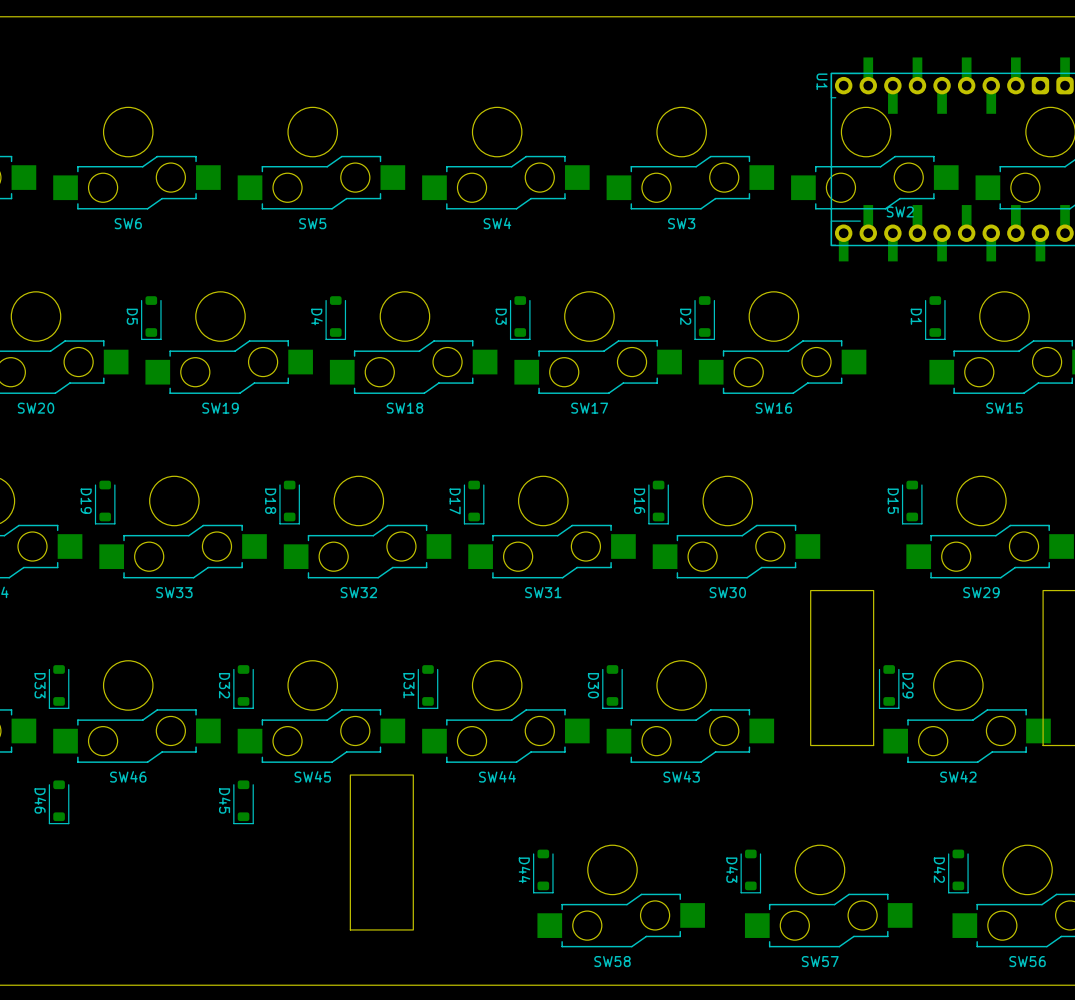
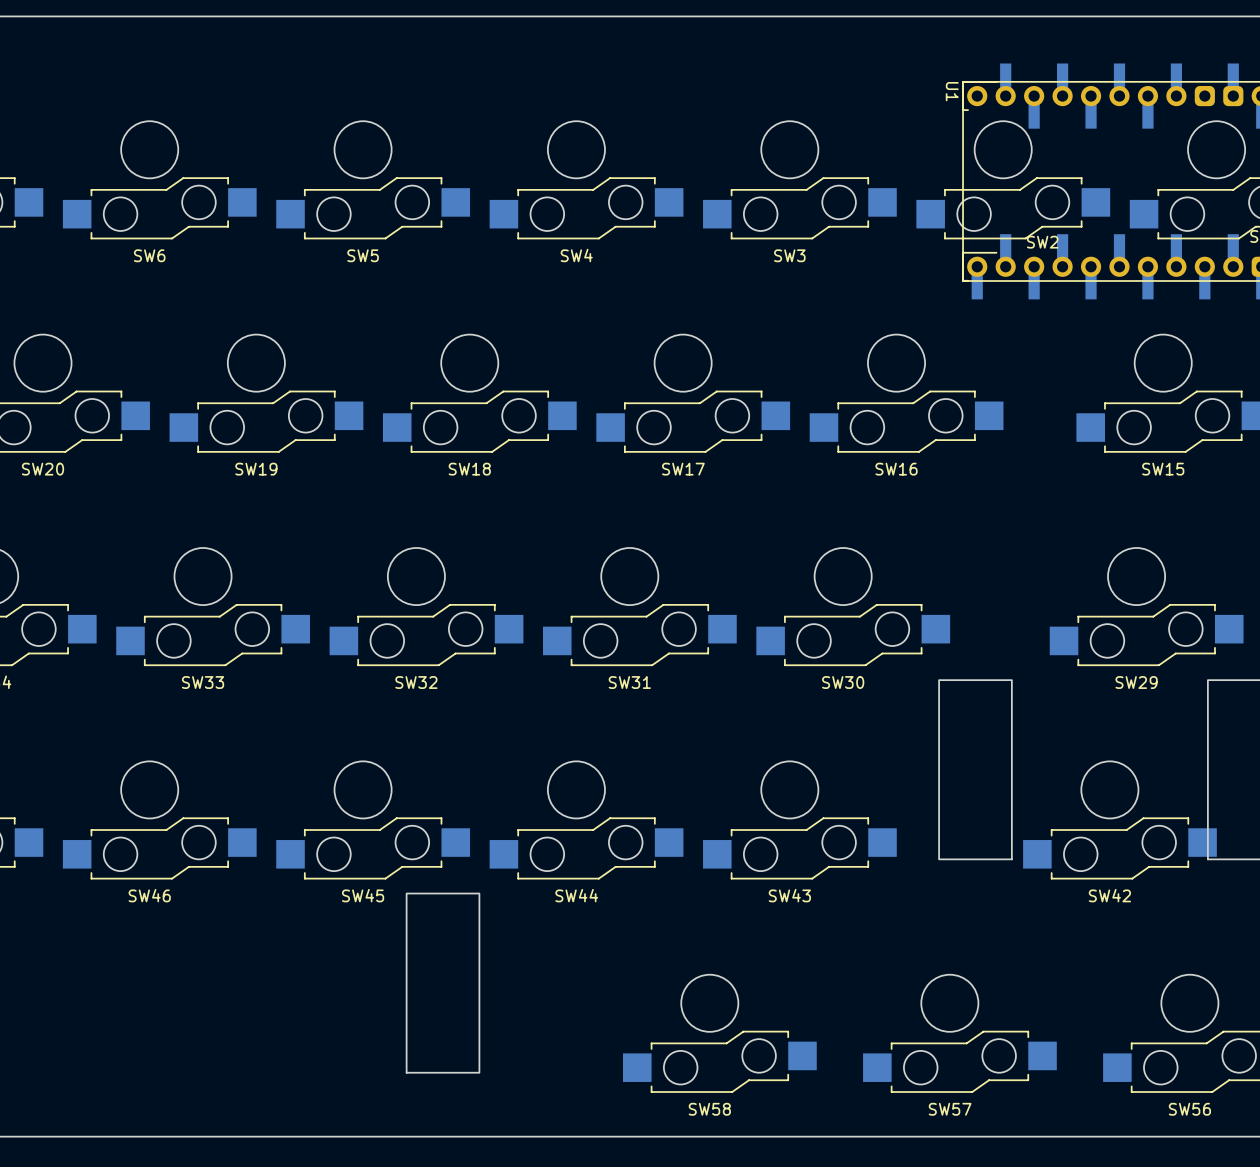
D5: (151, 318) -> none
D4: (335, 318) -> none
D3: (520, 318) -> none
D2: (704, 318) -> none
D1: (935, 318) -> none
D19: (105, 502) -> none
D18: (289, 502) -> none
D17: (474, 502) -> none
D16: (658, 502) -> none
D15: (912, 502) -> none
D33: (59, 687) -> none
D32: (243, 687) -> none
D31: (428, 687) -> none
D30: (612, 687) -> none
D29: (889, 687) -> none
D46: (59, 802) -> none
D45: (243, 802) -> none
D44: (543, 871) -> none
D43: (750, 871) -> none
D42: (958, 871) -> none

